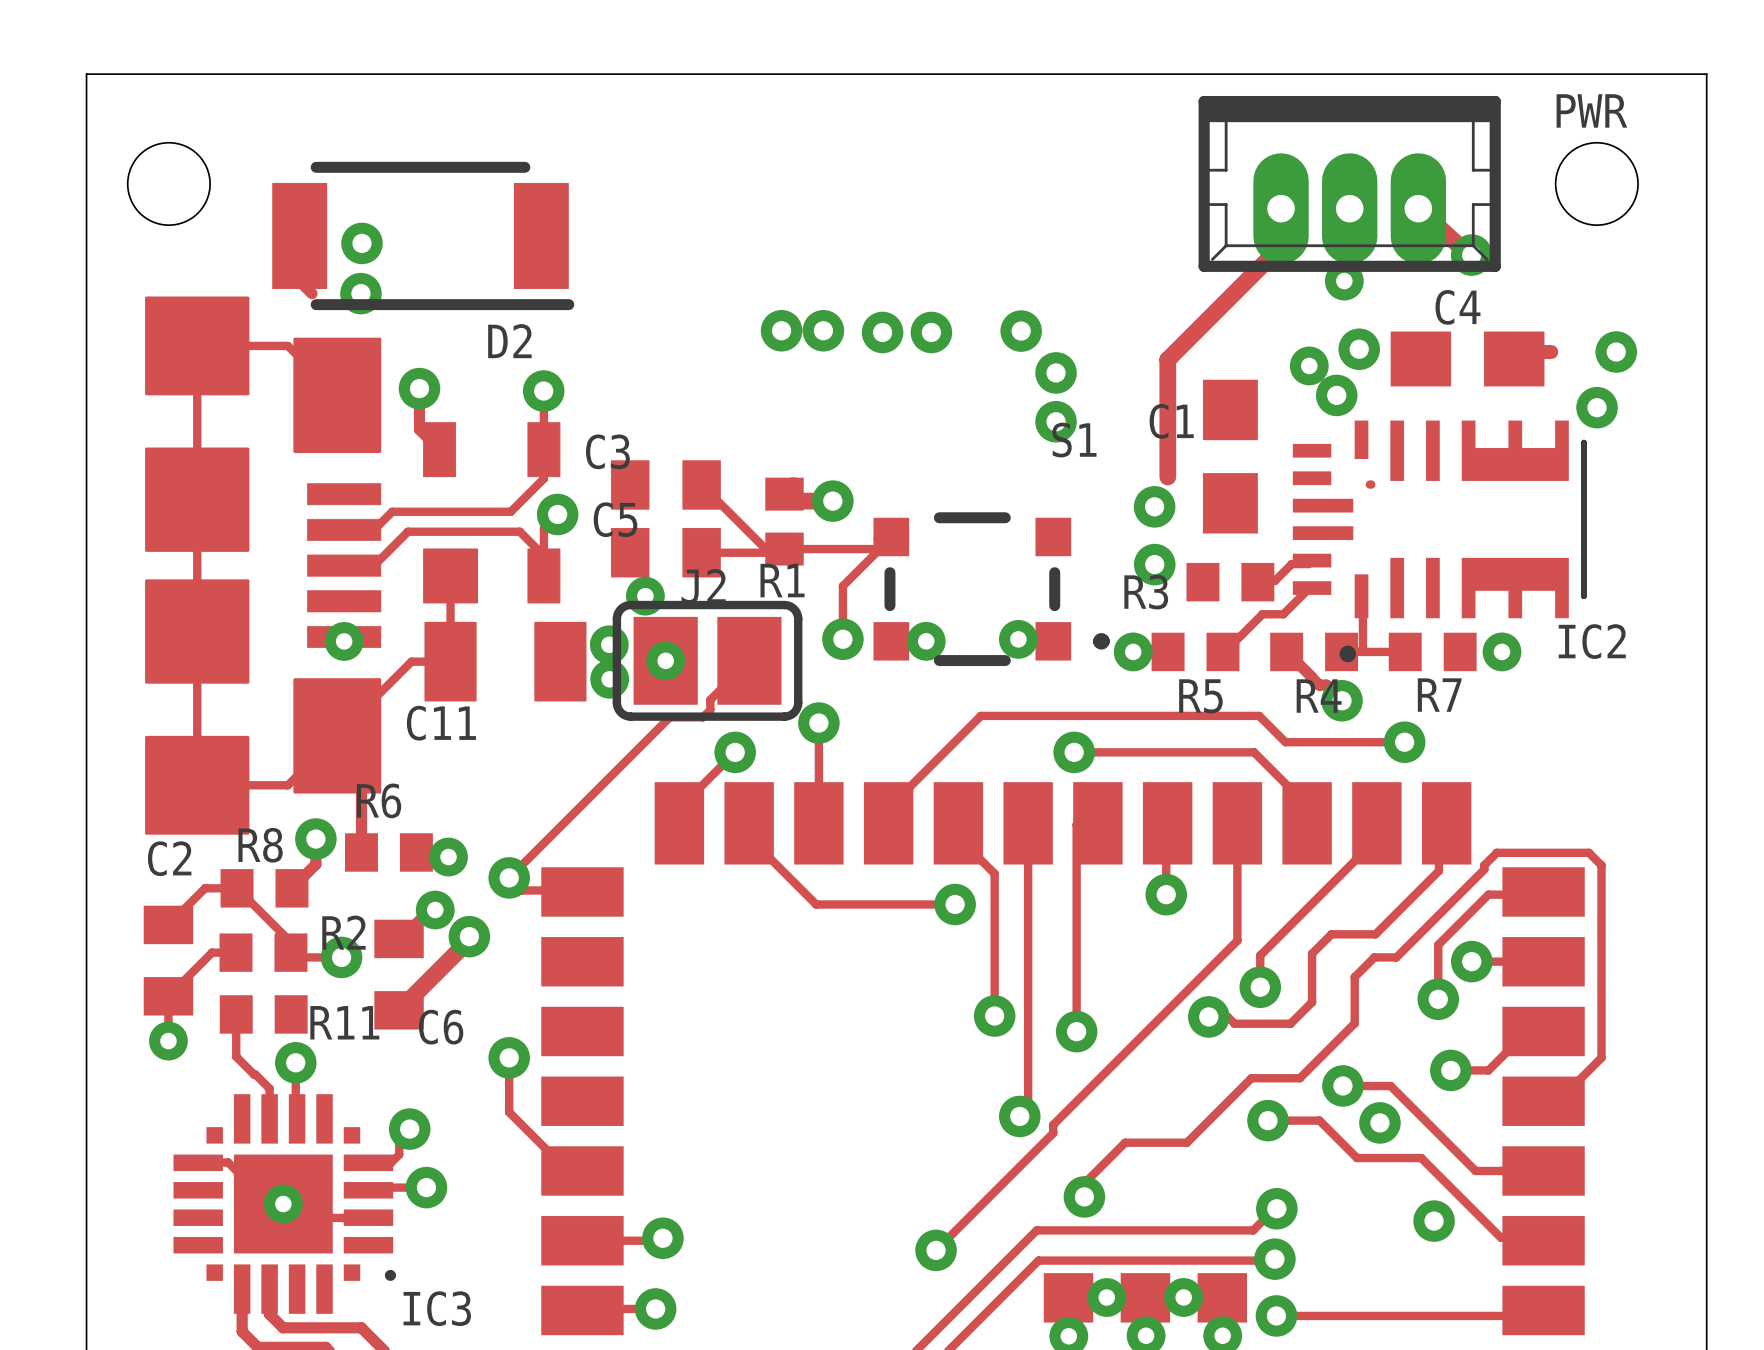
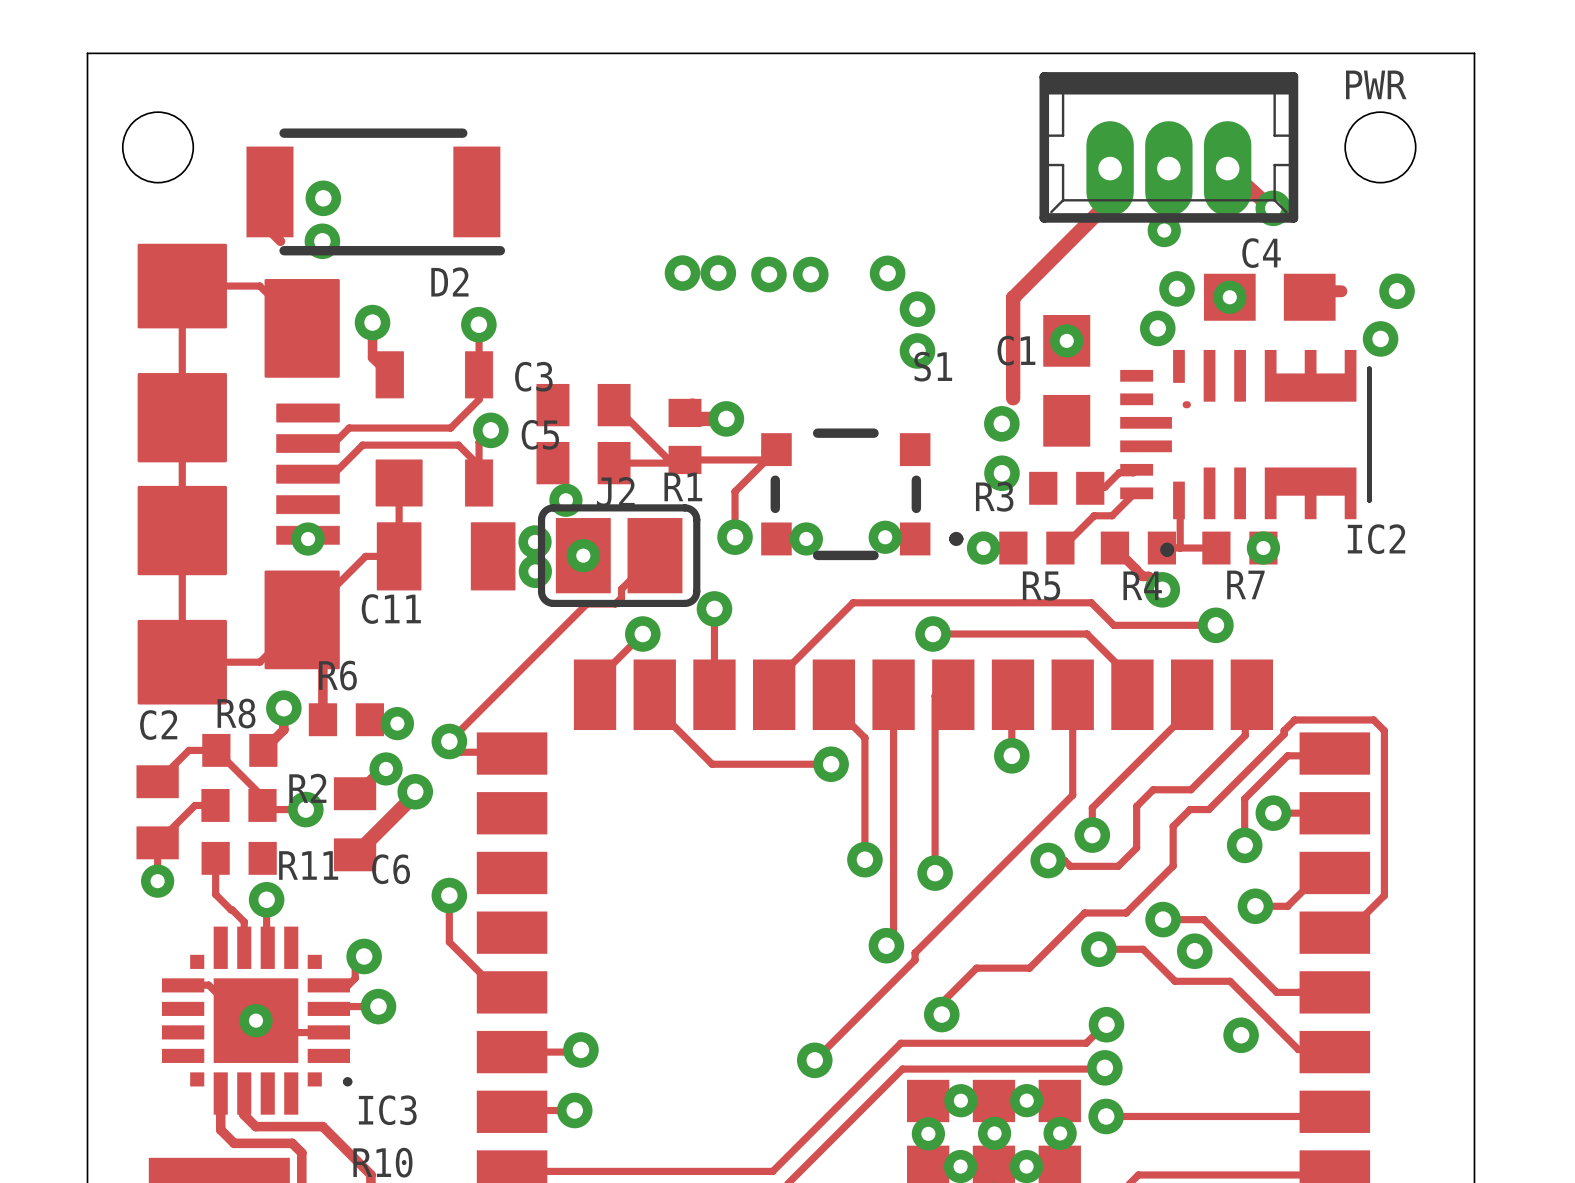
via: none -> (1229, 297)
via: (1309, 365) -> none
via: none -> (1066, 340)
via position: (1502, 651) -> (1263, 548)

